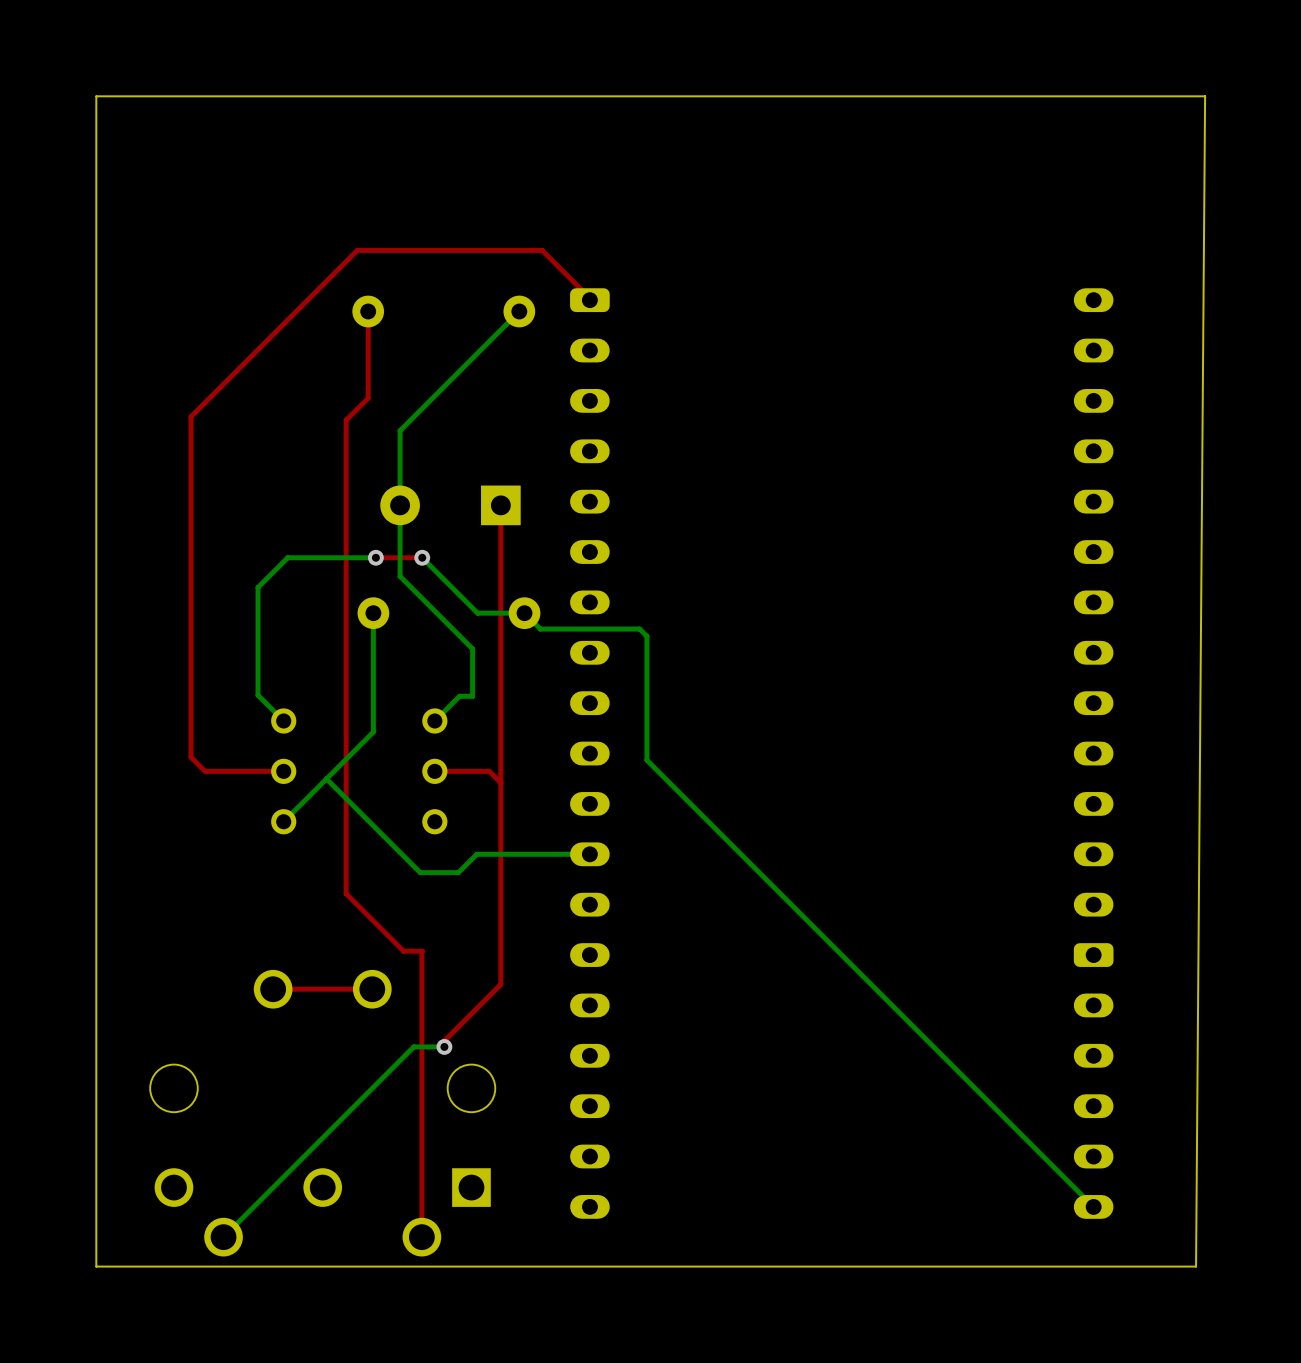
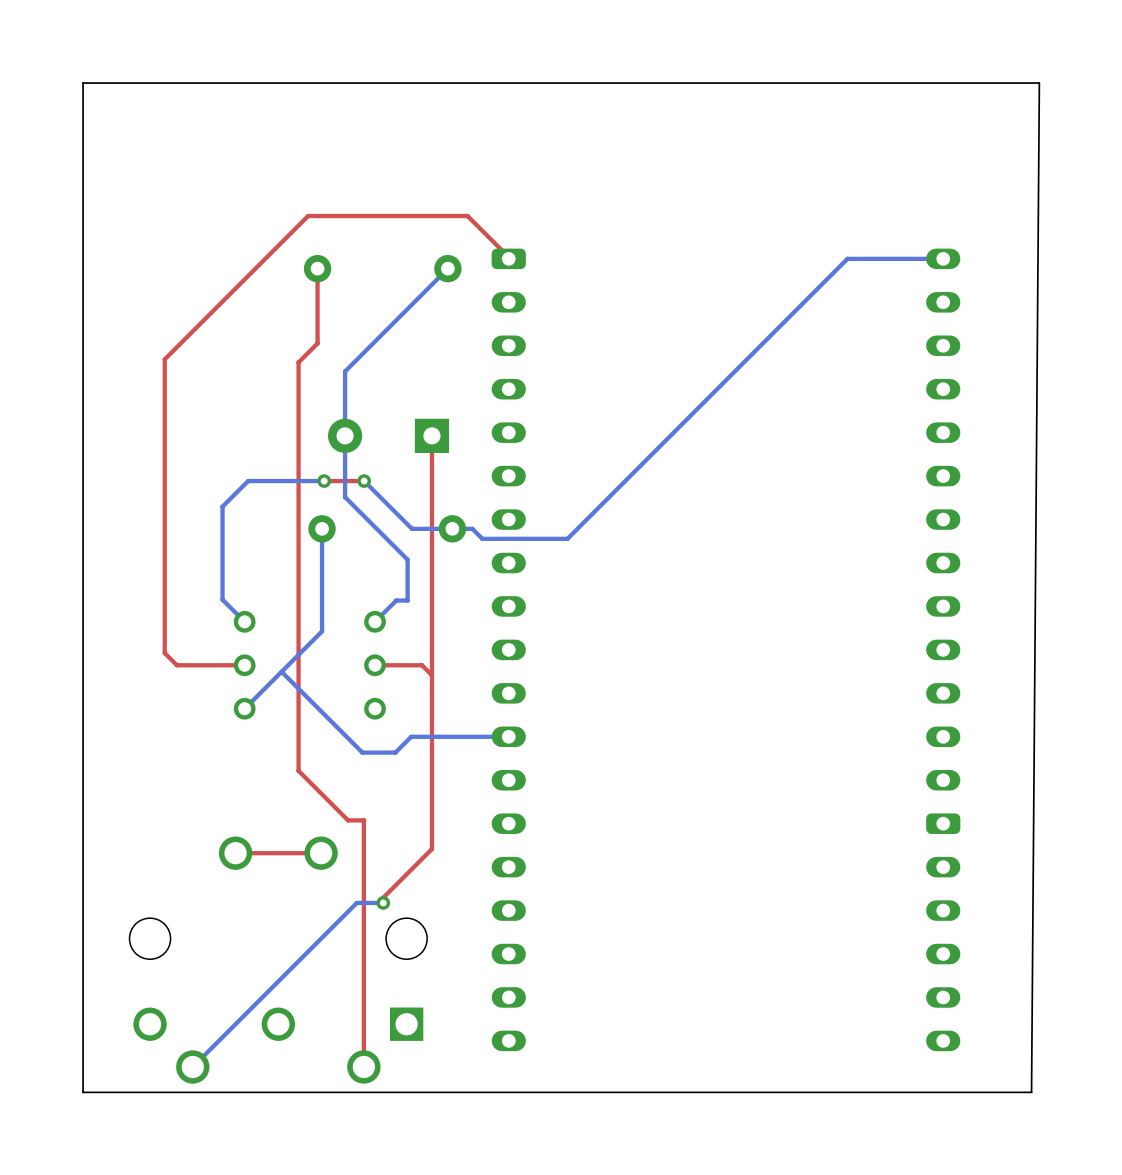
bottom track: (524, 613) (540, 629) (639, 629) (646, 636) (646, 760) (1093, 1206) -> (452, 528) (472, 528) (482, 538) (567, 538) (847, 258) (943, 258)

